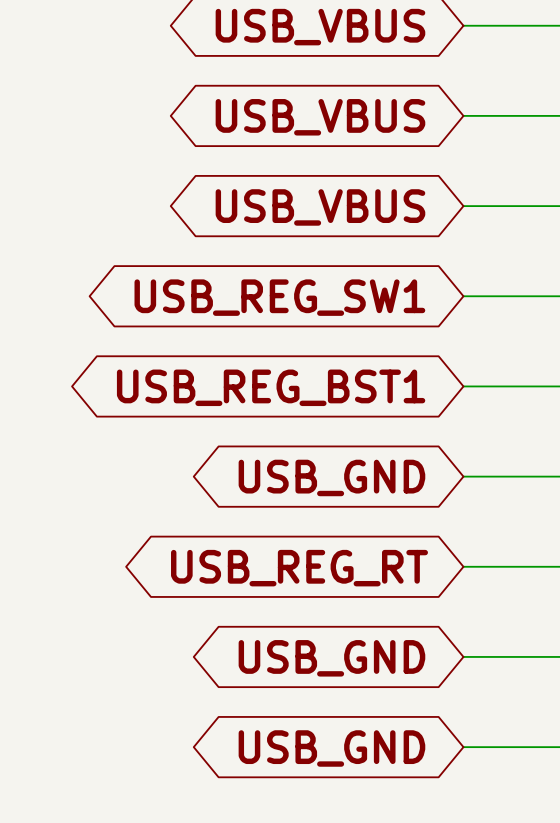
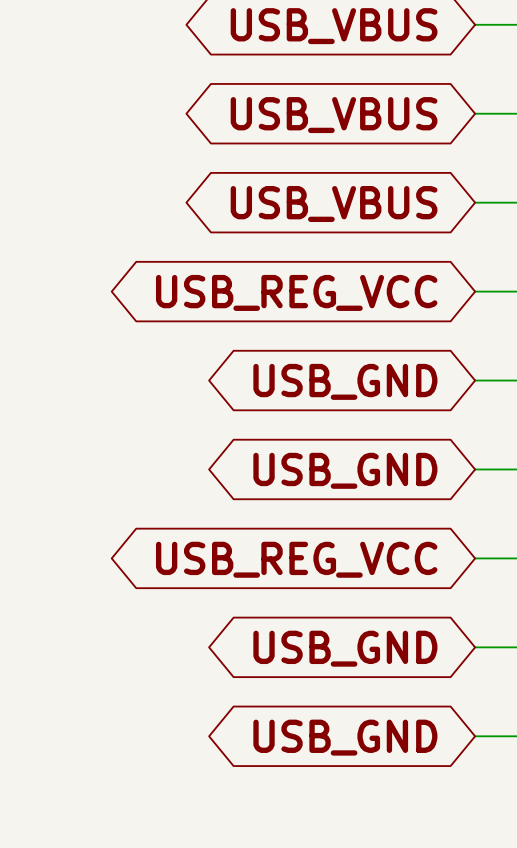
global label: USB_REG_SW1 (279, 297) -> USB_REG_VCC (296, 292)
global label: USB_REG_BST1 (271, 387) -> USB_GND (345, 381)
global label: USB_REG_RT (299, 568) -> USB_REG_VCC (296, 559)

